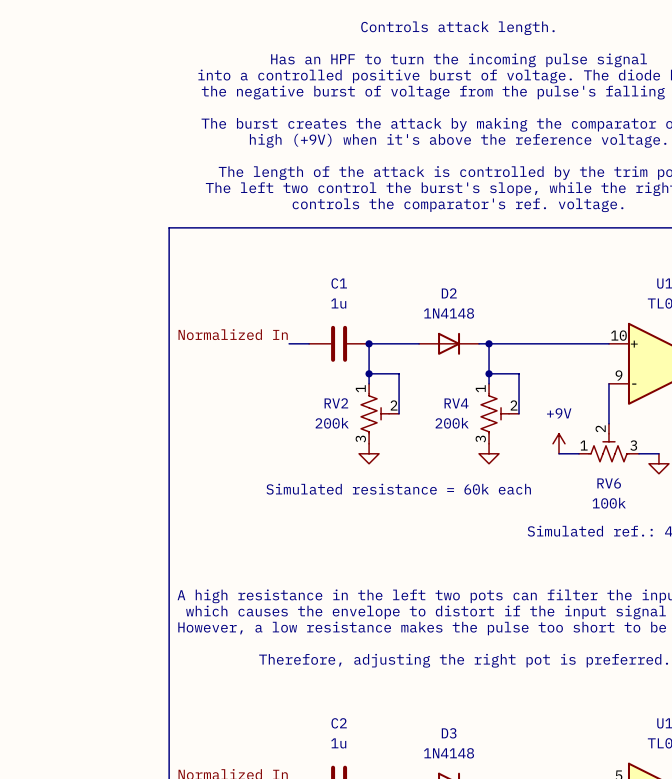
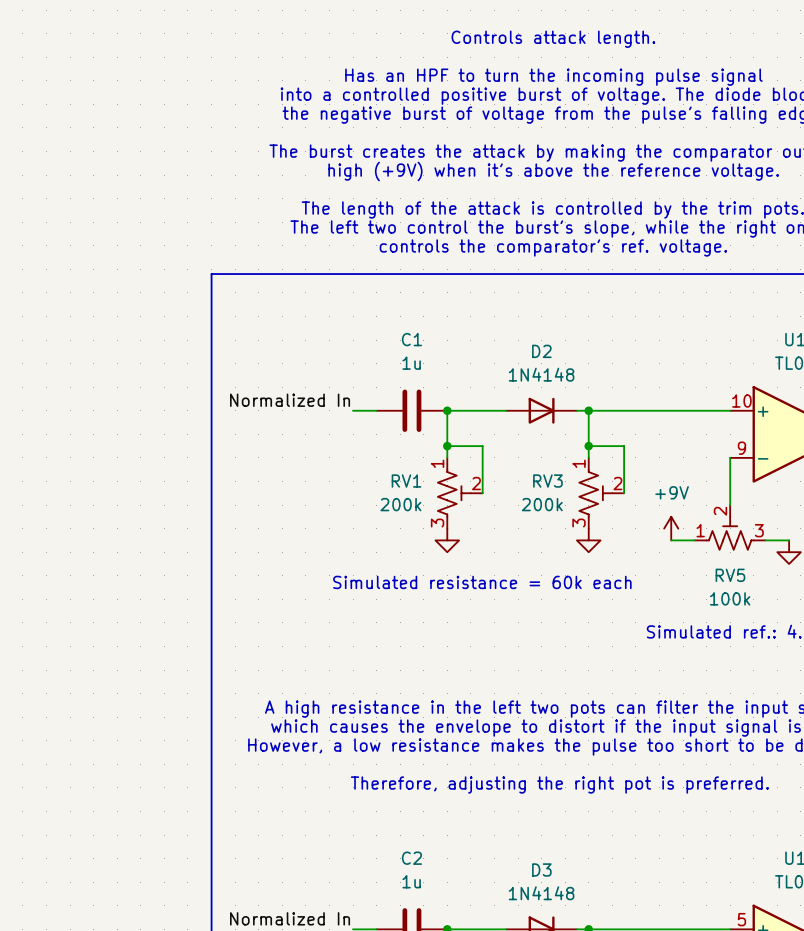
RV2 name: RV2 (336, 403) -> RV1 (406, 481)
RV4 name: RV4 (456, 403) -> RV3 (547, 481)
RV6 name: RV6 (609, 483) -> RV5 (730, 575)

